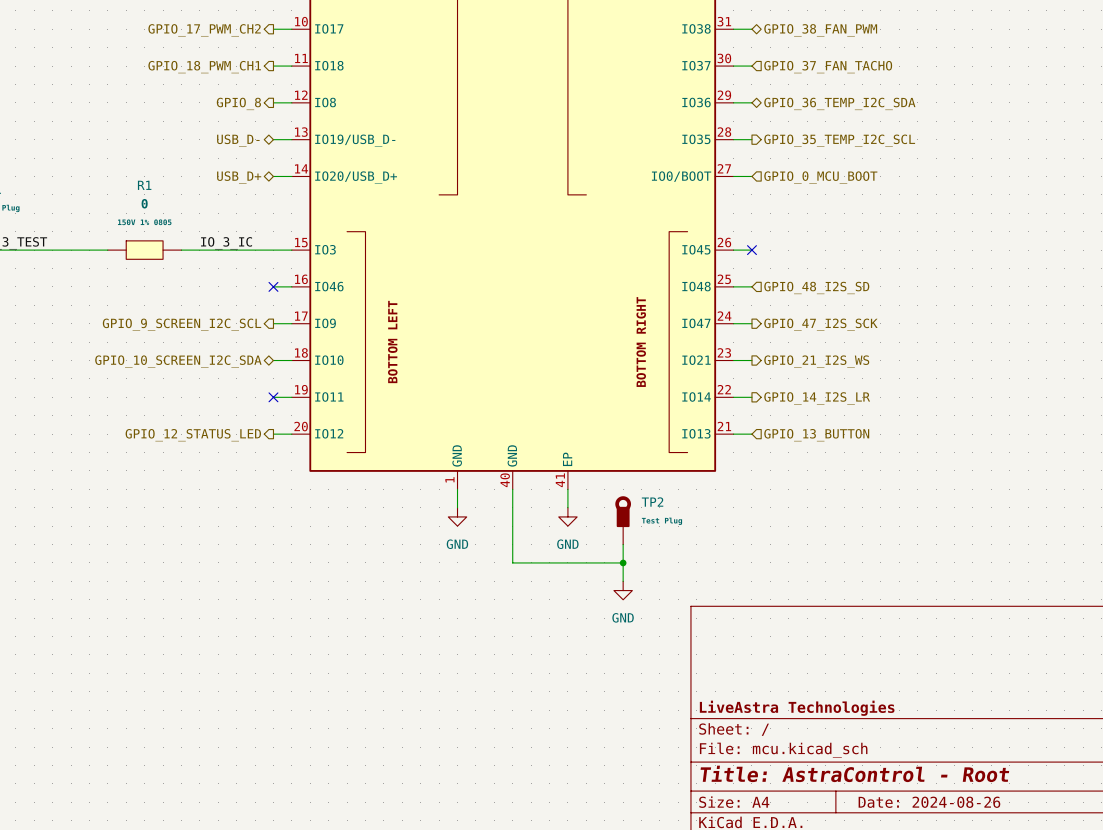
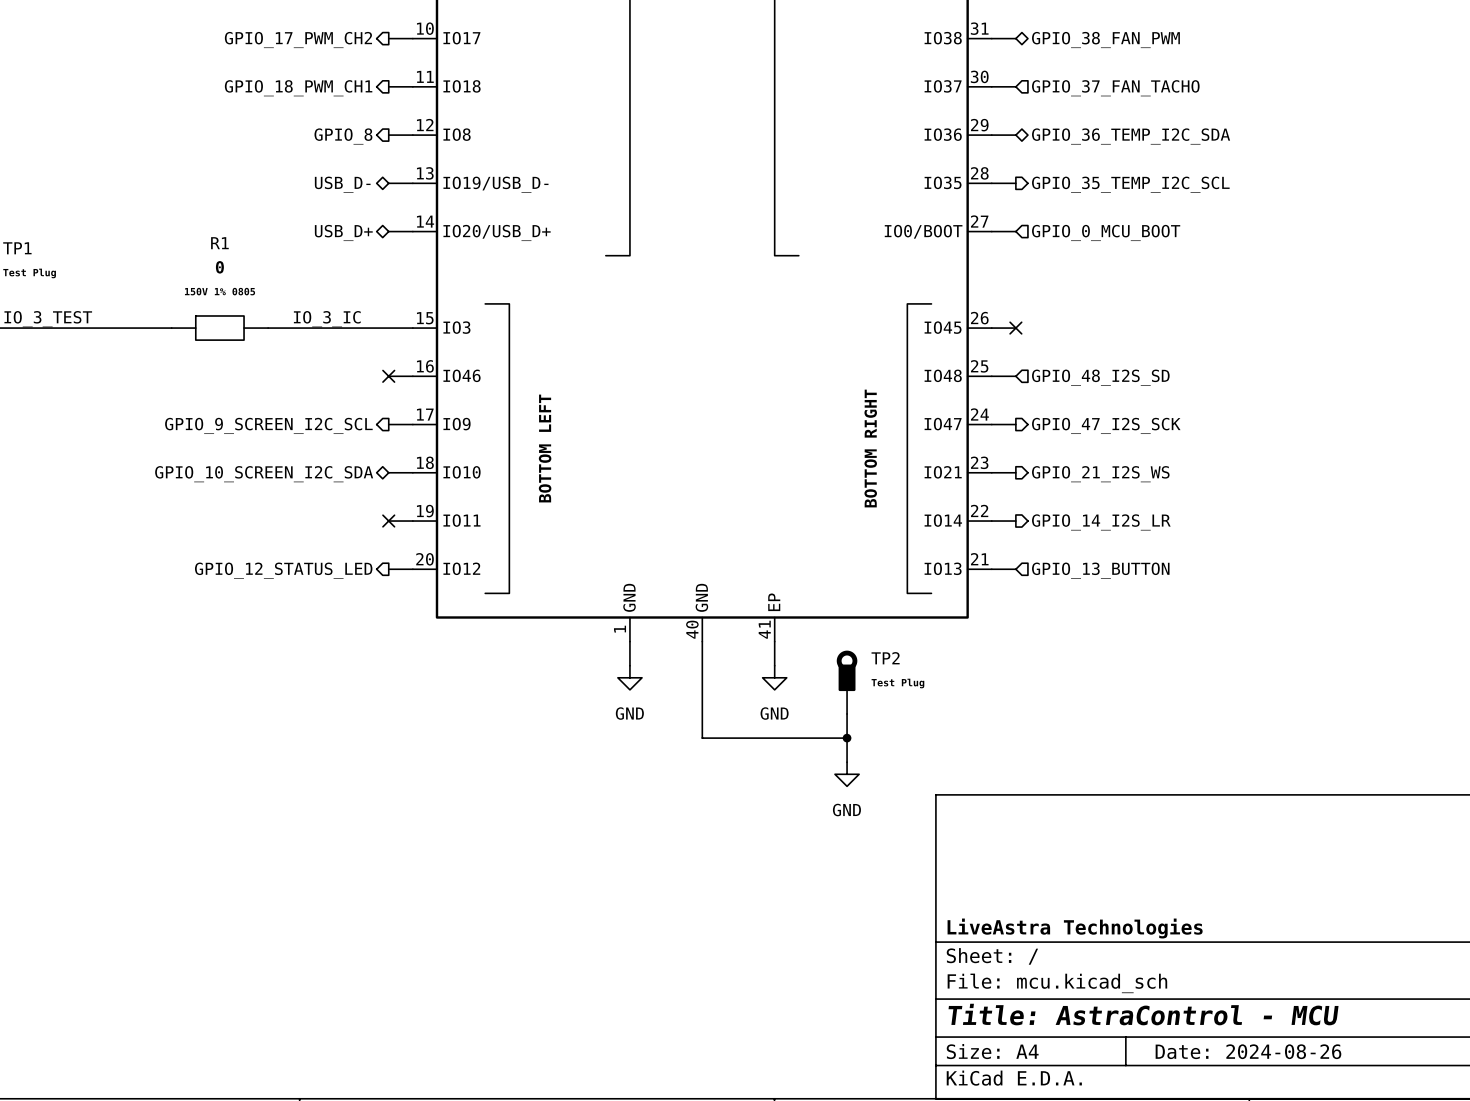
title block: Title: AstraControl - Root (854, 773) -> Title: AstraControl - MCU (1143, 1014)

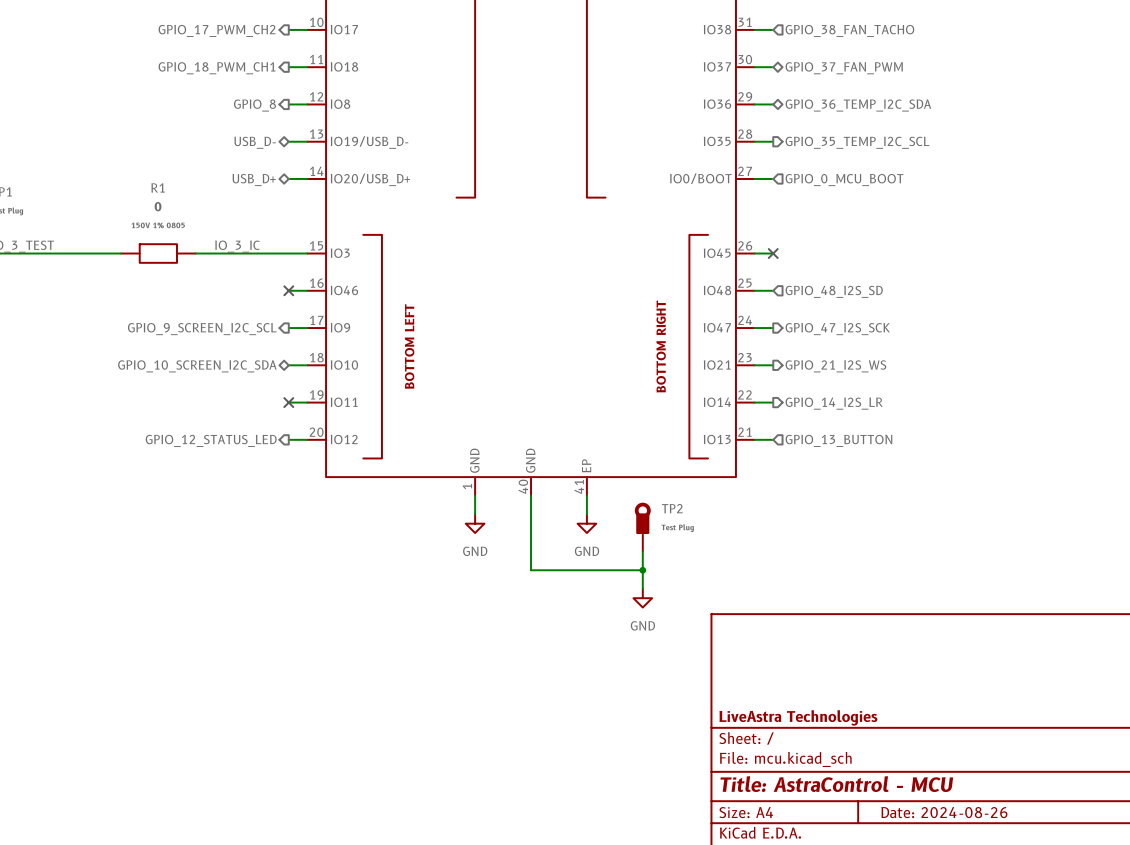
hierarchical label shape: bidirectional (1105, 39) -> input (849, 30)
hierarchical label: GPIO_38_FAN_PWM (1105, 39) -> GPIO_38_FAN_TACHO (849, 30)
hierarchical label shape: input (1115, 88) -> bidirectional (844, 68)
hierarchical label: GPIO_37_FAN_TACHO (1115, 88) -> GPIO_37_FAN_PWM (844, 68)

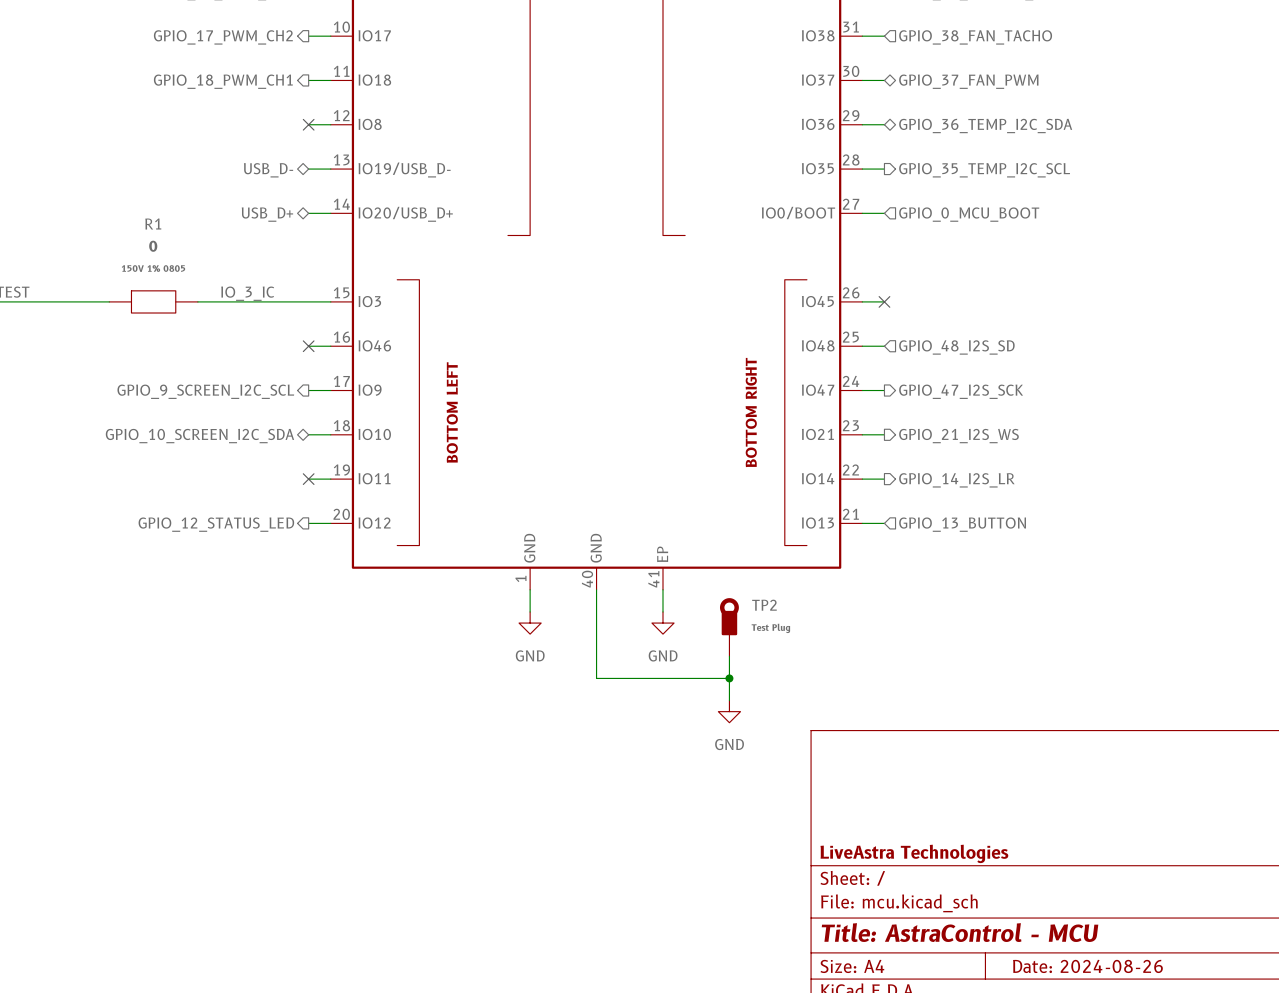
no-connect mark: none -> (308, 124)
hierarchical label: GPIO_8 (254, 105) -> none

